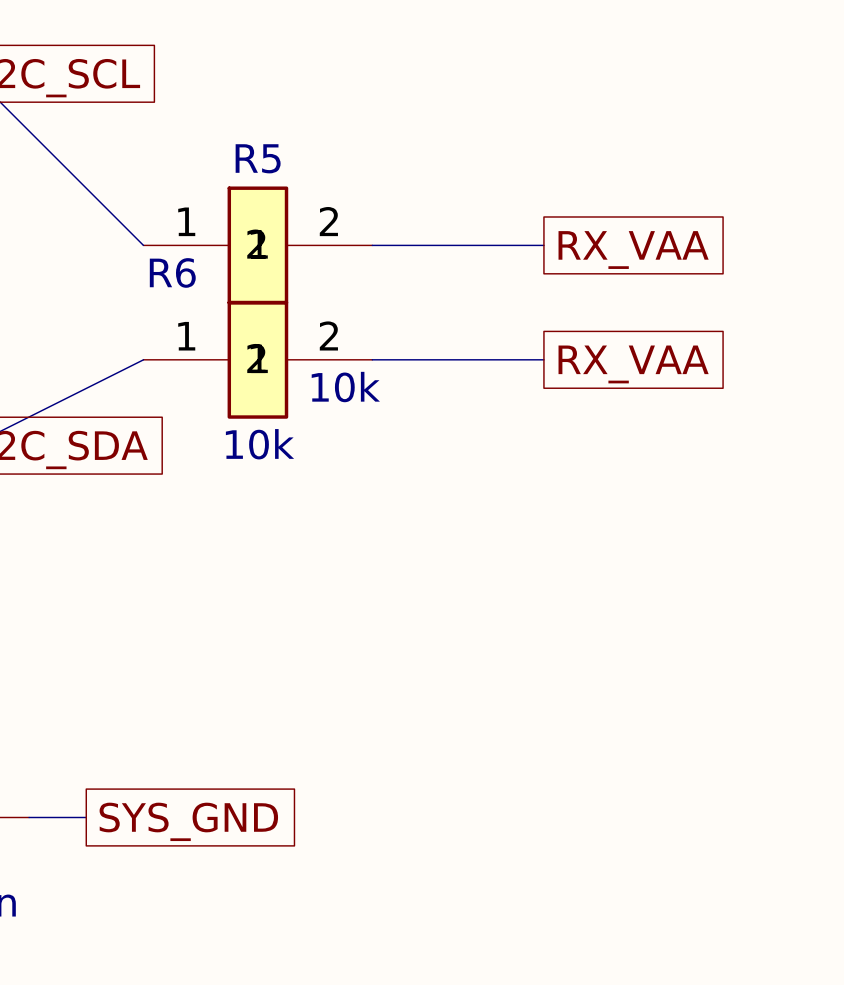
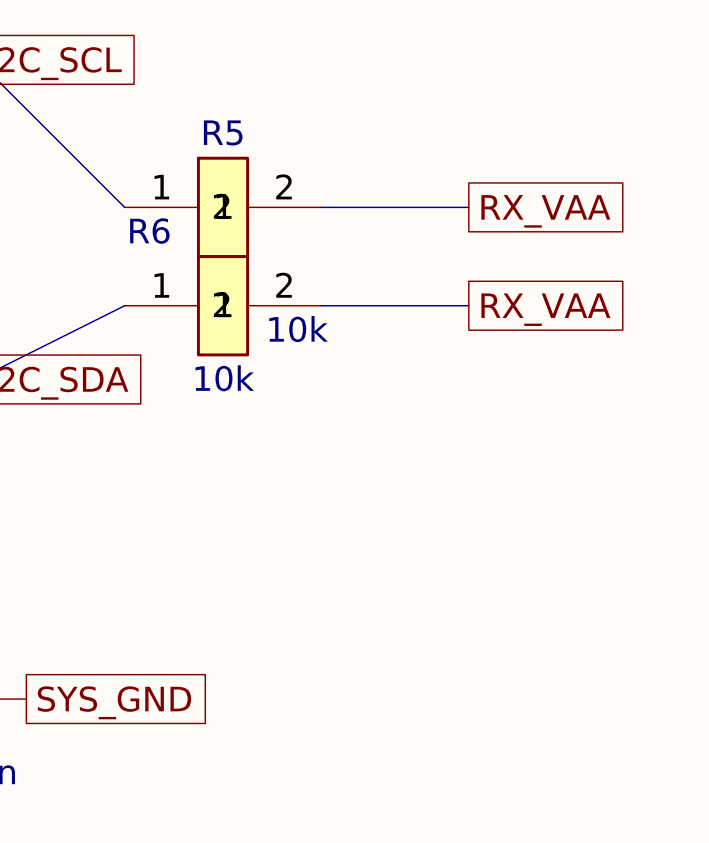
wire: (29, 817) (86, 817) -> none
global label position: SYS_GND (188, 821) -> SYS_GND (114, 702)

